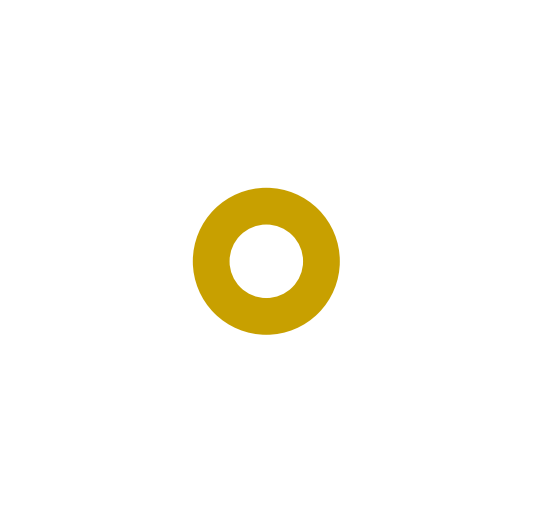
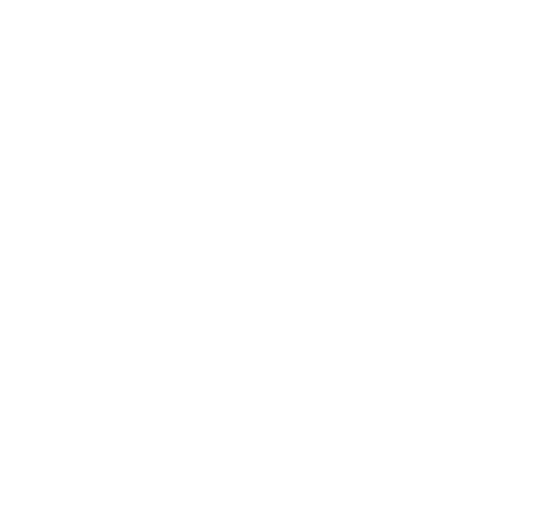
part: (266, 261) -> none

